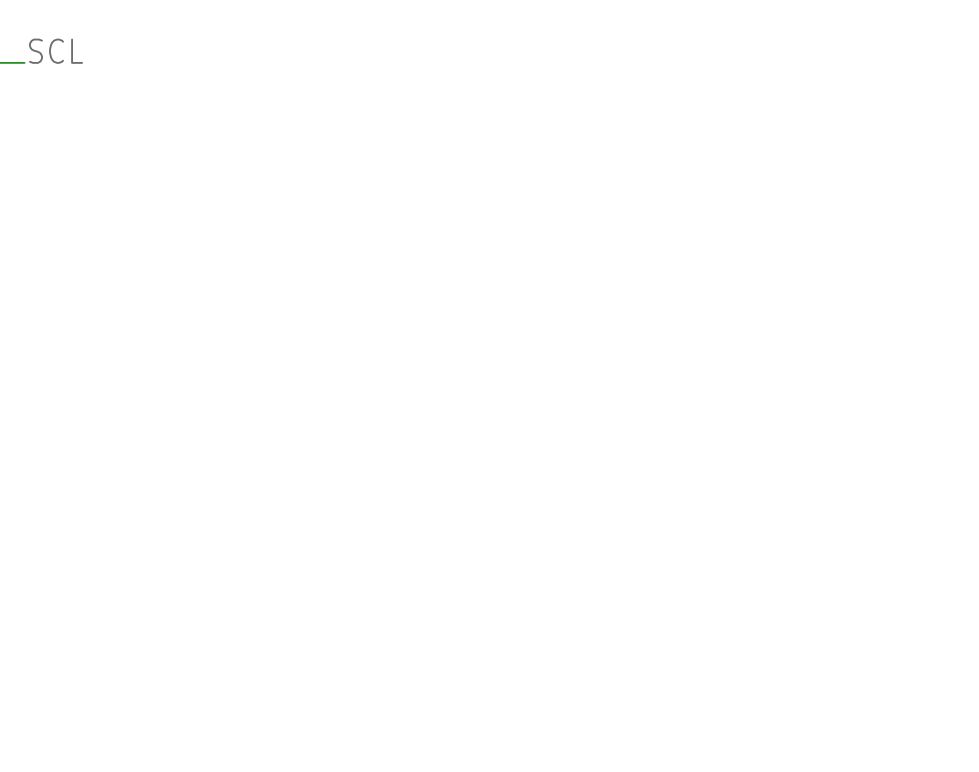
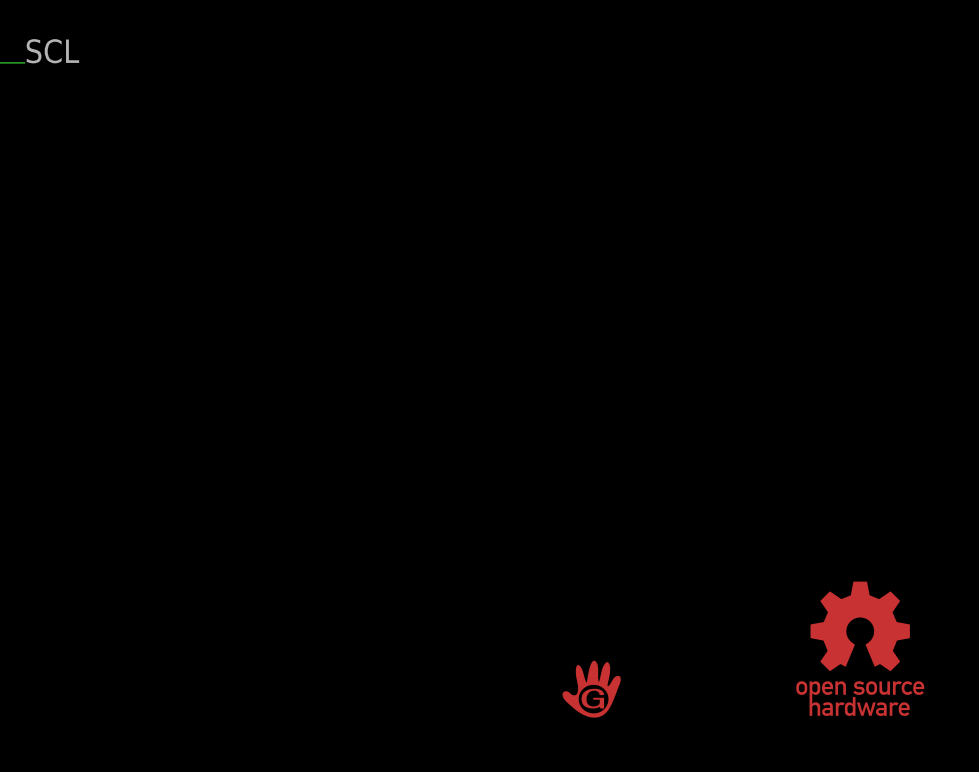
part: none -> (860, 648)
part: none -> (591, 689)

